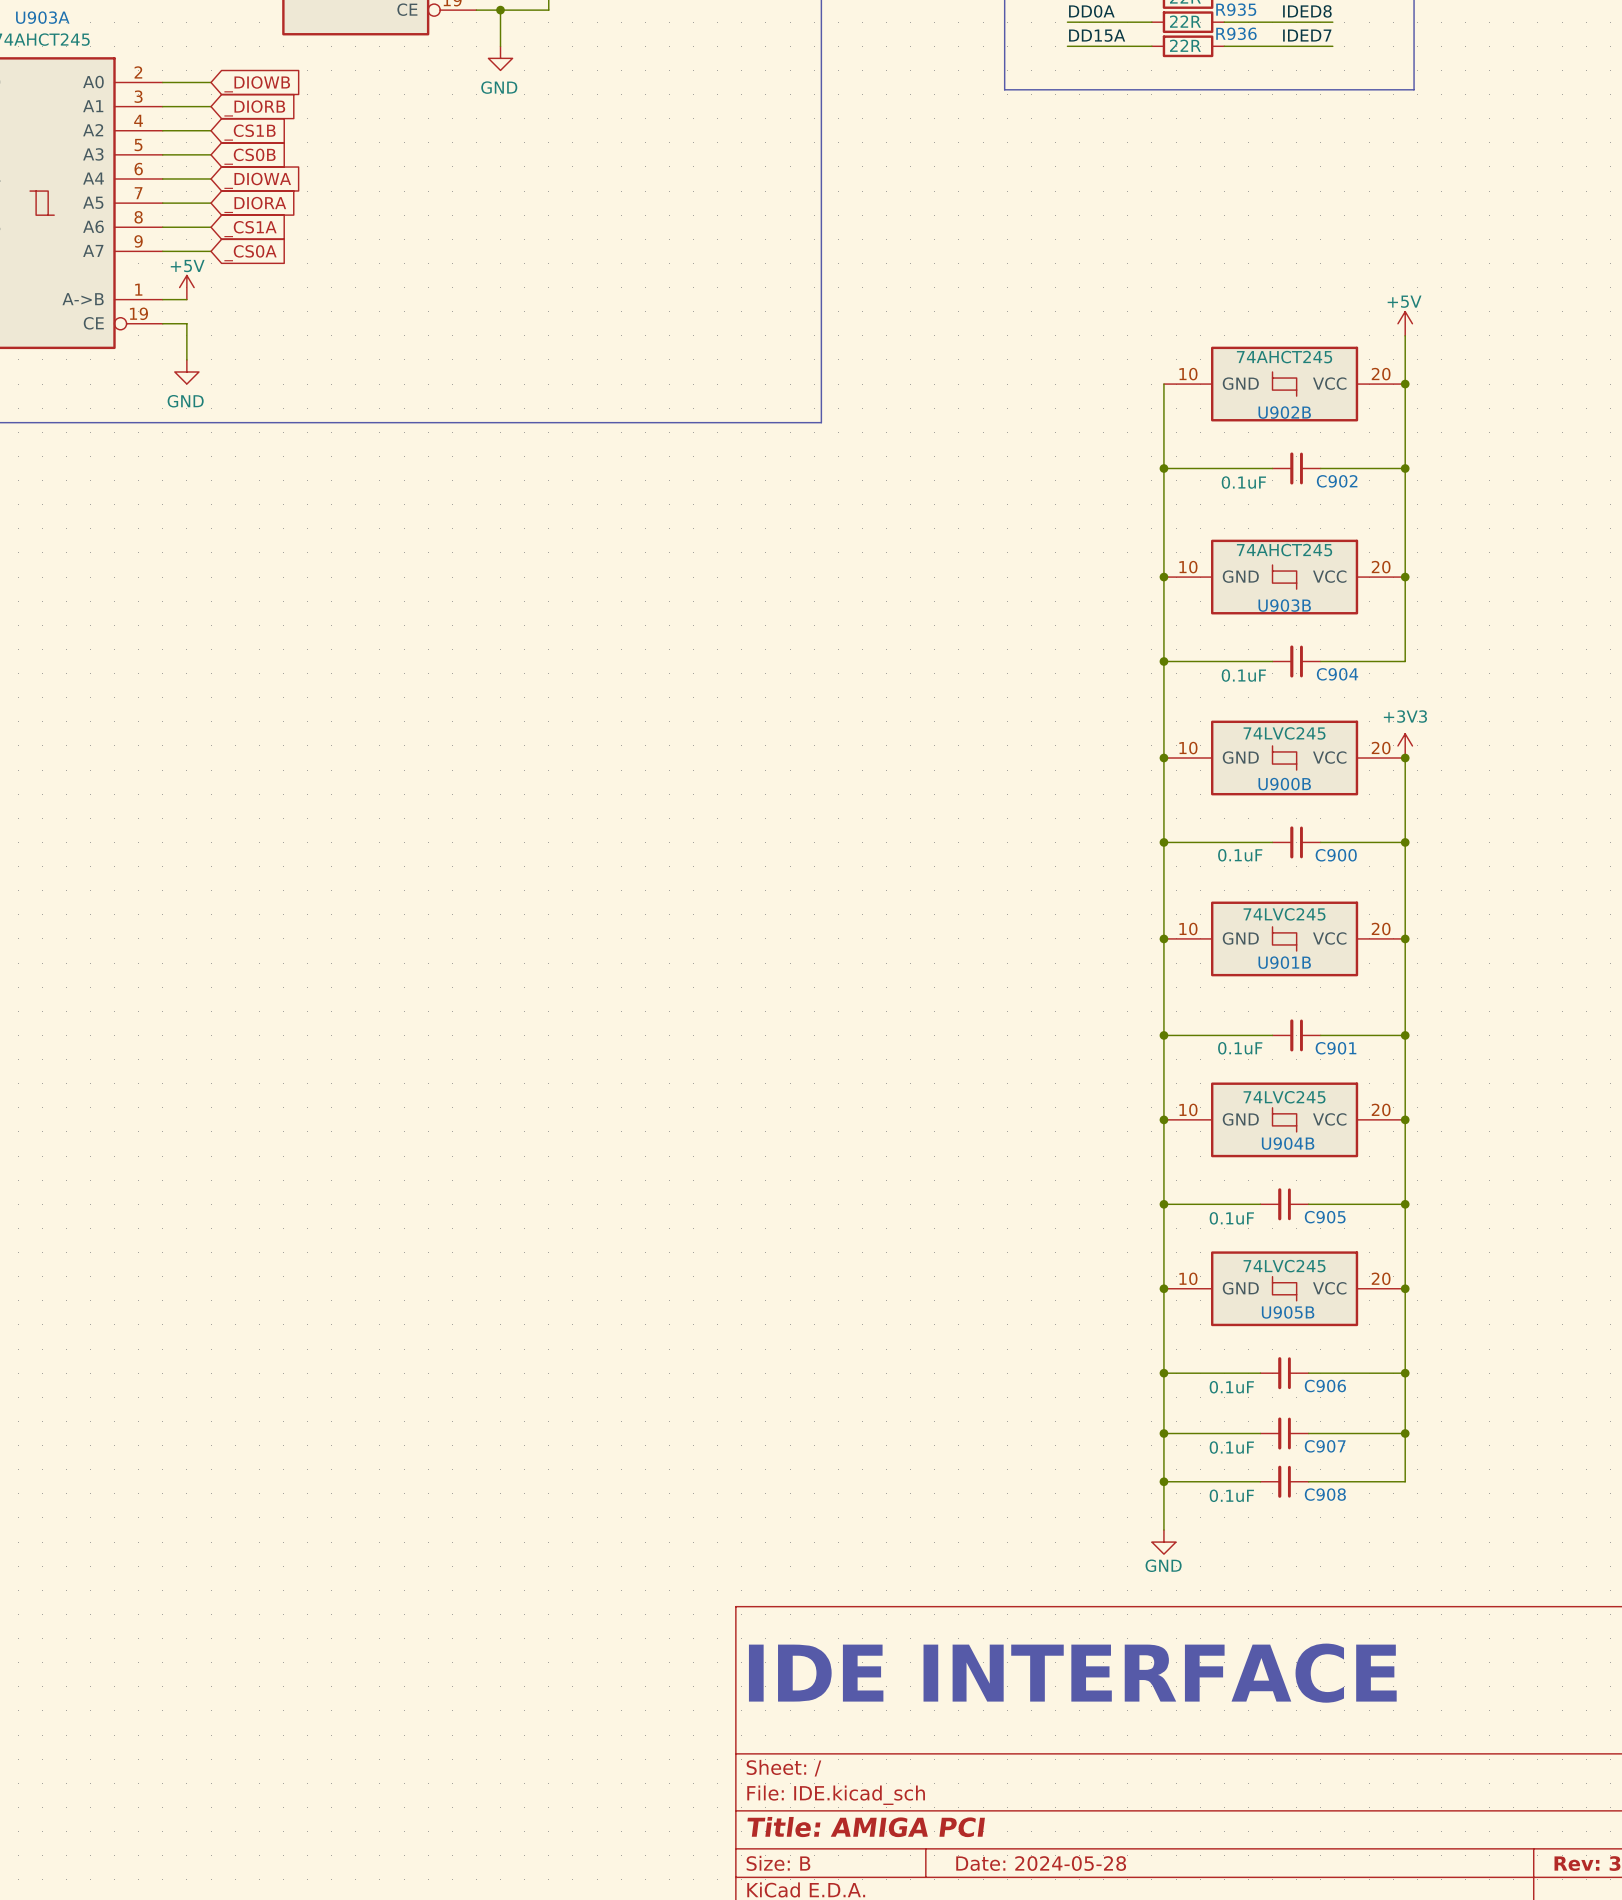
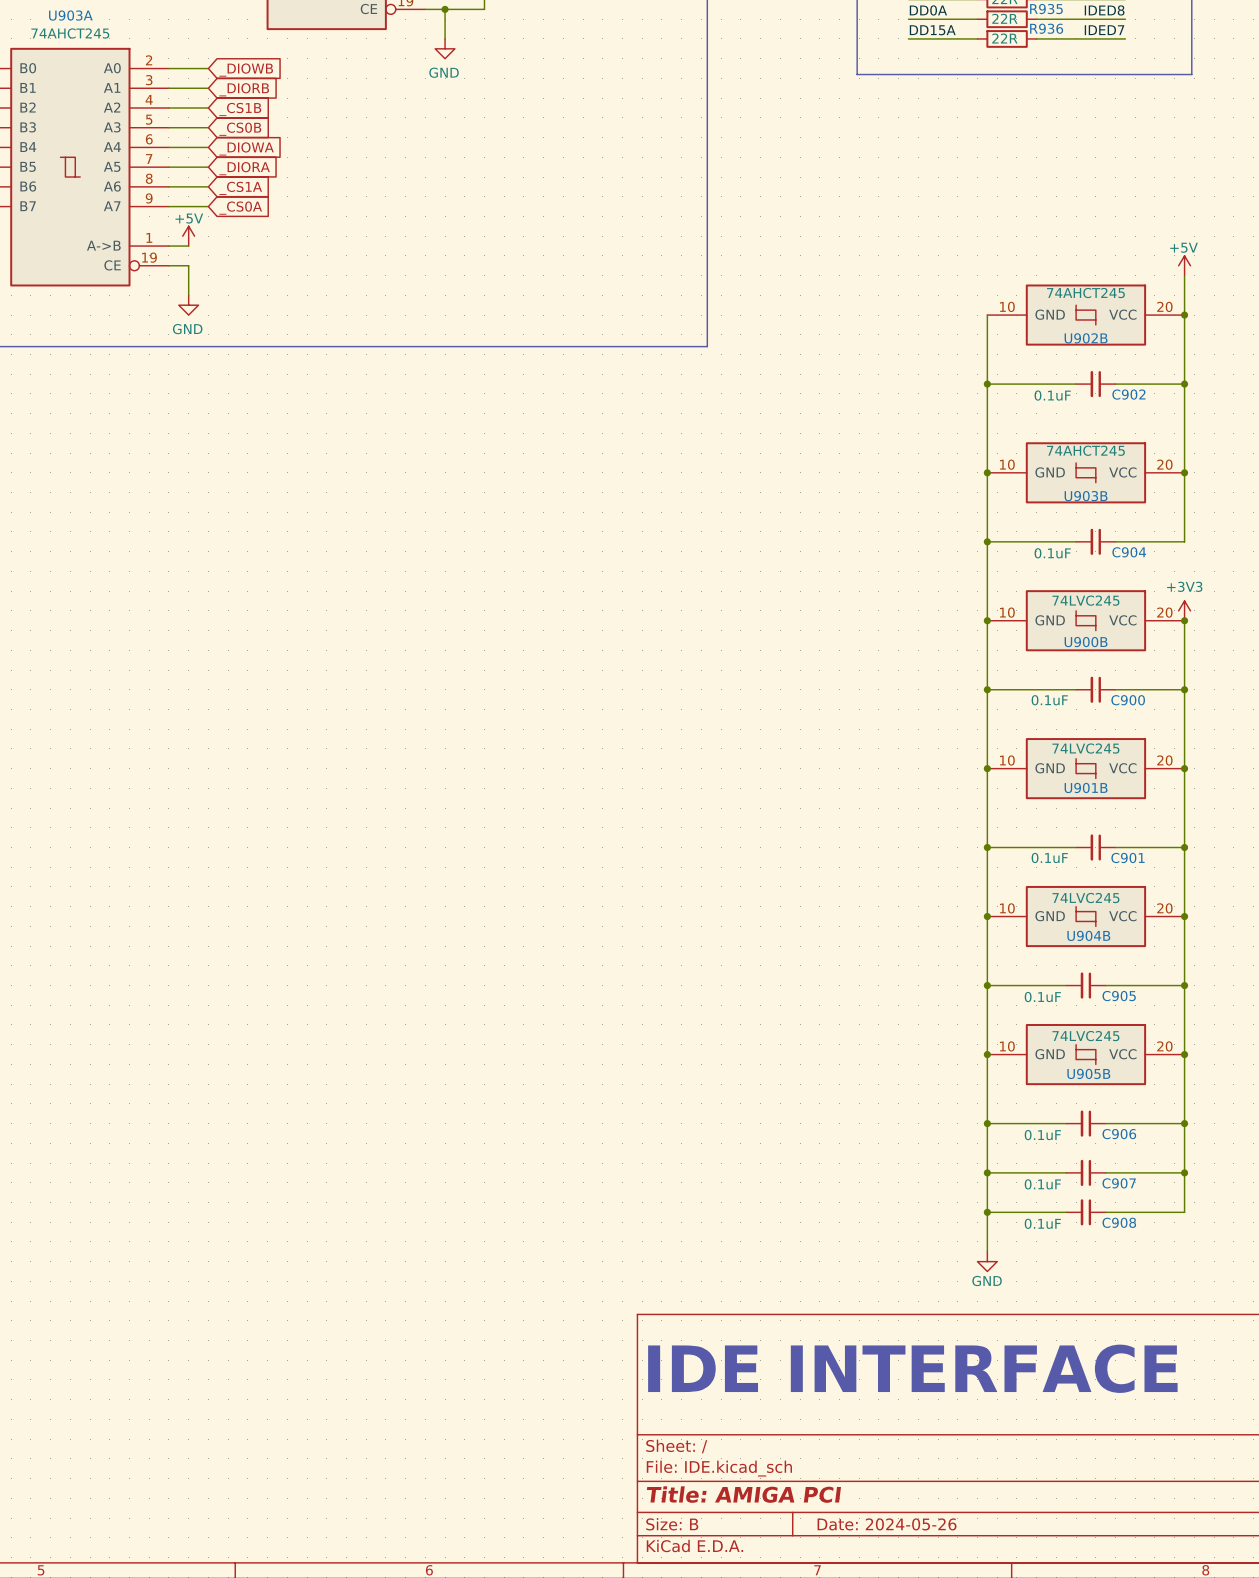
title block: Date: 2024-05-28 (1041, 1863) -> Date: 2024-05-26 (887, 1524)

